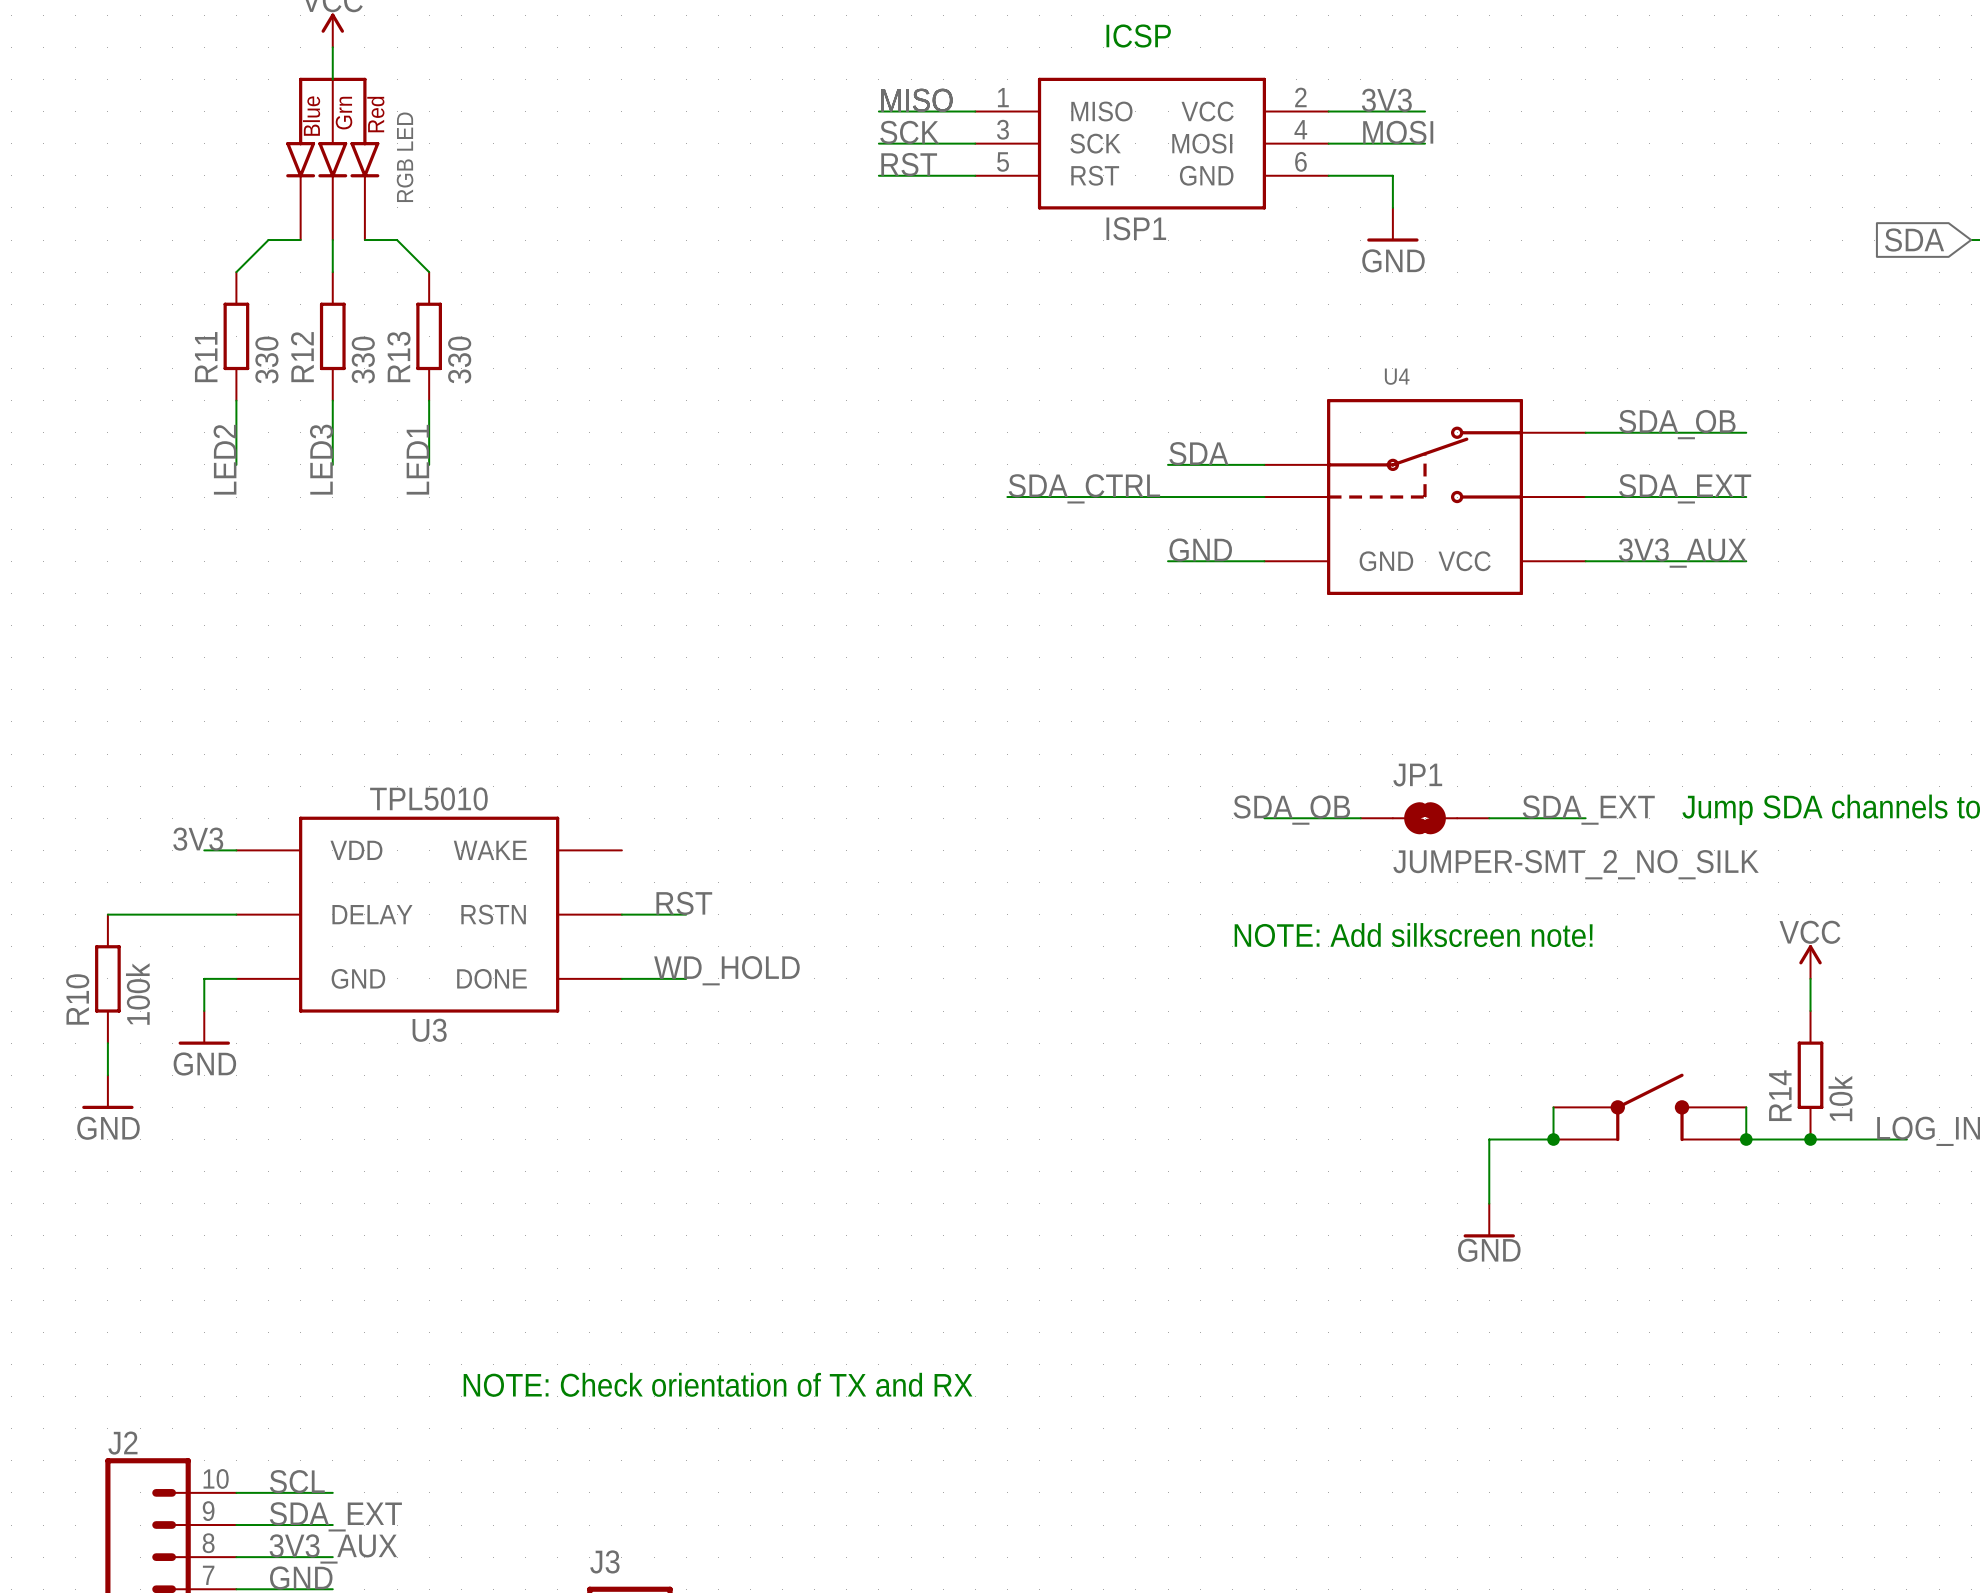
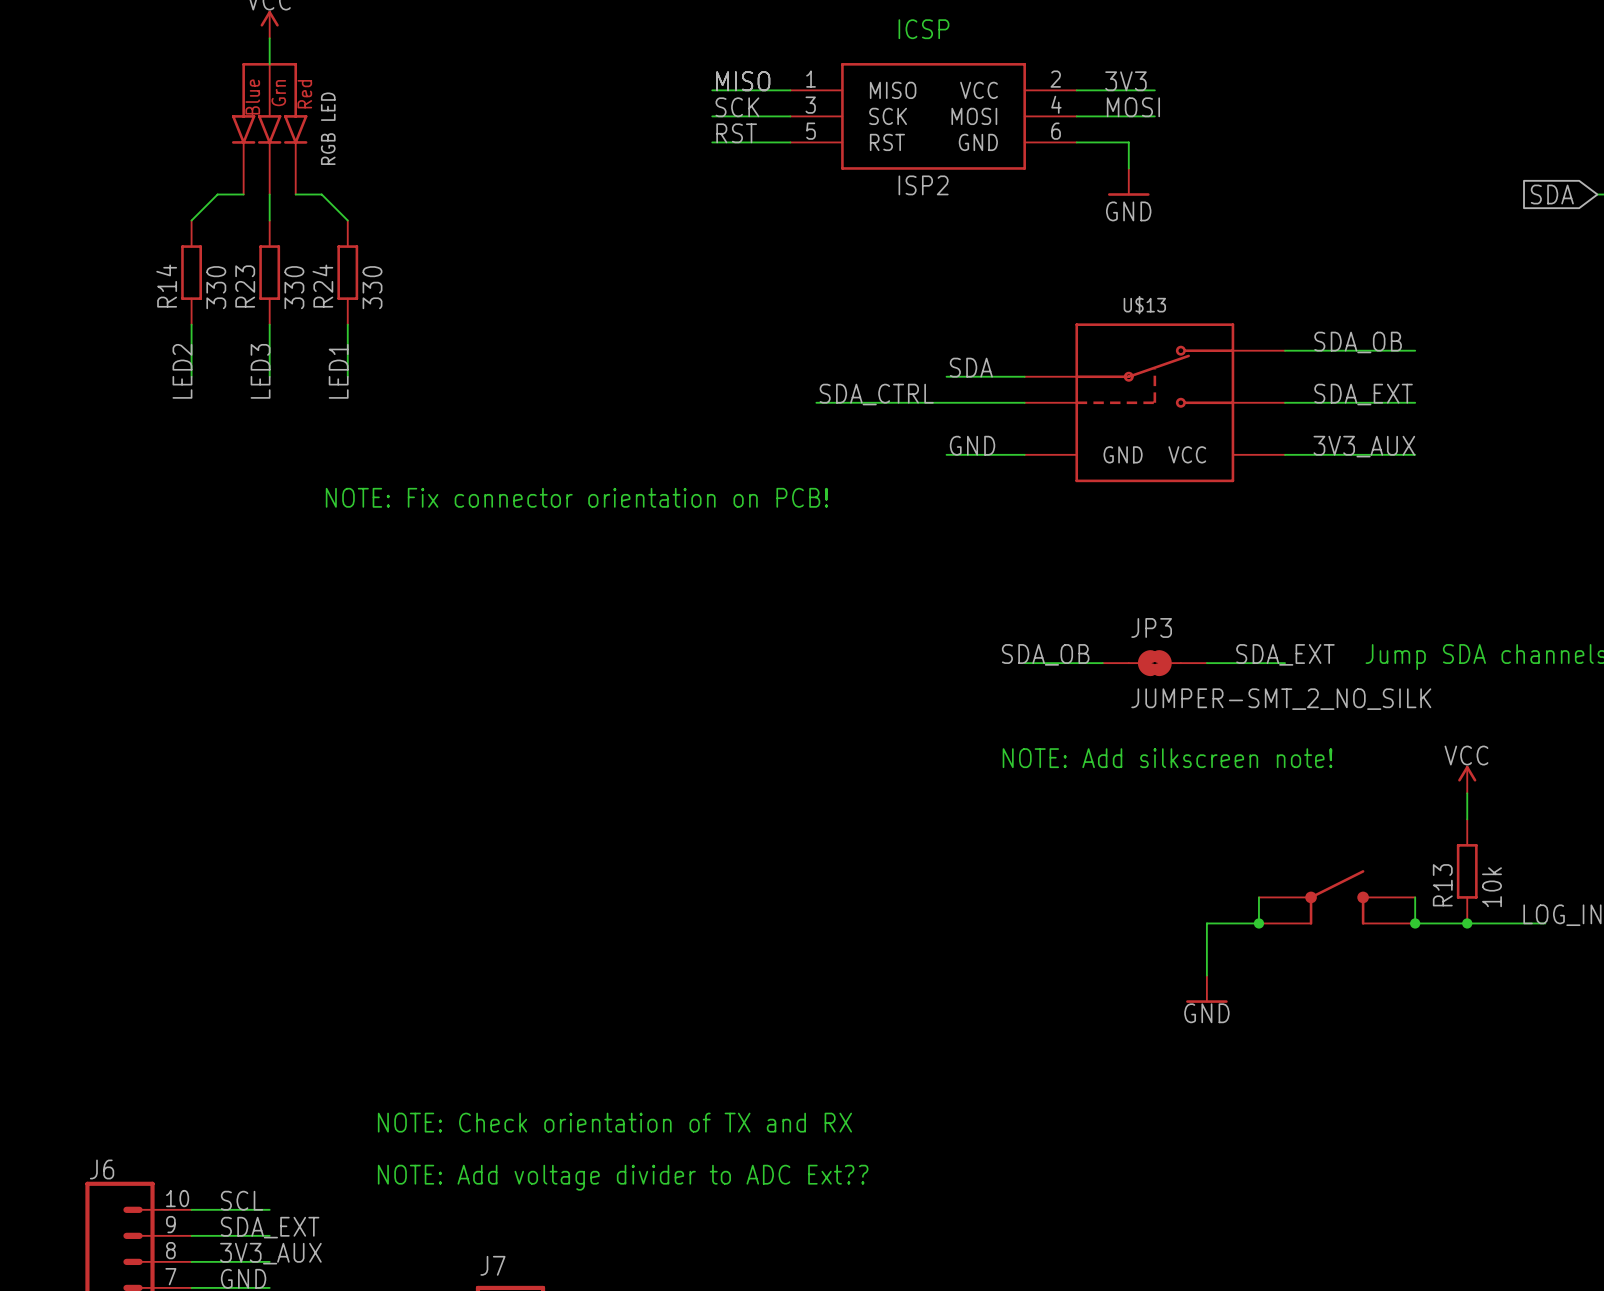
ISP1 name: ISP1 (1136, 228) -> ISP2 (923, 185)
R11 name: R11 (206, 357) -> R14 (166, 286)
R12 name: R12 (302, 357) -> R23 (245, 286)
R13 name: R13 (398, 357) -> R24 (322, 286)
U4 name: U4 (1397, 376) -> U$13 (1144, 305)
text: none -> NOTE: Fix connector orientation on PCB! (576, 497)
JP1 name: JP1 (1417, 775) -> JP3 (1151, 627)
label: 3V3 (198, 839) -> none
wire: (204, 850) (236, 850) -> none
label: RST (684, 903) -> none
wire: (107, 914) (236, 914) -> none
U3: (429, 914) -> none
wire: (621, 914) (686, 914) -> none
label: WD_HOLD (726, 970) -> none
R10: 100k (107, 978) -> none
wire: (236, 978) (204, 978) (204, 1011) -> none
wire: (621, 978) (686, 978) -> none
power symbol: GND (204, 1027) -> none
wire: (107, 1043) (107, 1075) -> none
power symbol: GND (107, 1092) -> none
R14 name: R14 (1780, 1095) -> R13 (1442, 885)
J2 name: J2 (122, 1443) -> J6 (102, 1169)
text: none -> NOTE: Add voltage divider to ADC Ext?? (623, 1177)
J3 name: J3 (604, 1561) -> J7 (492, 1265)

